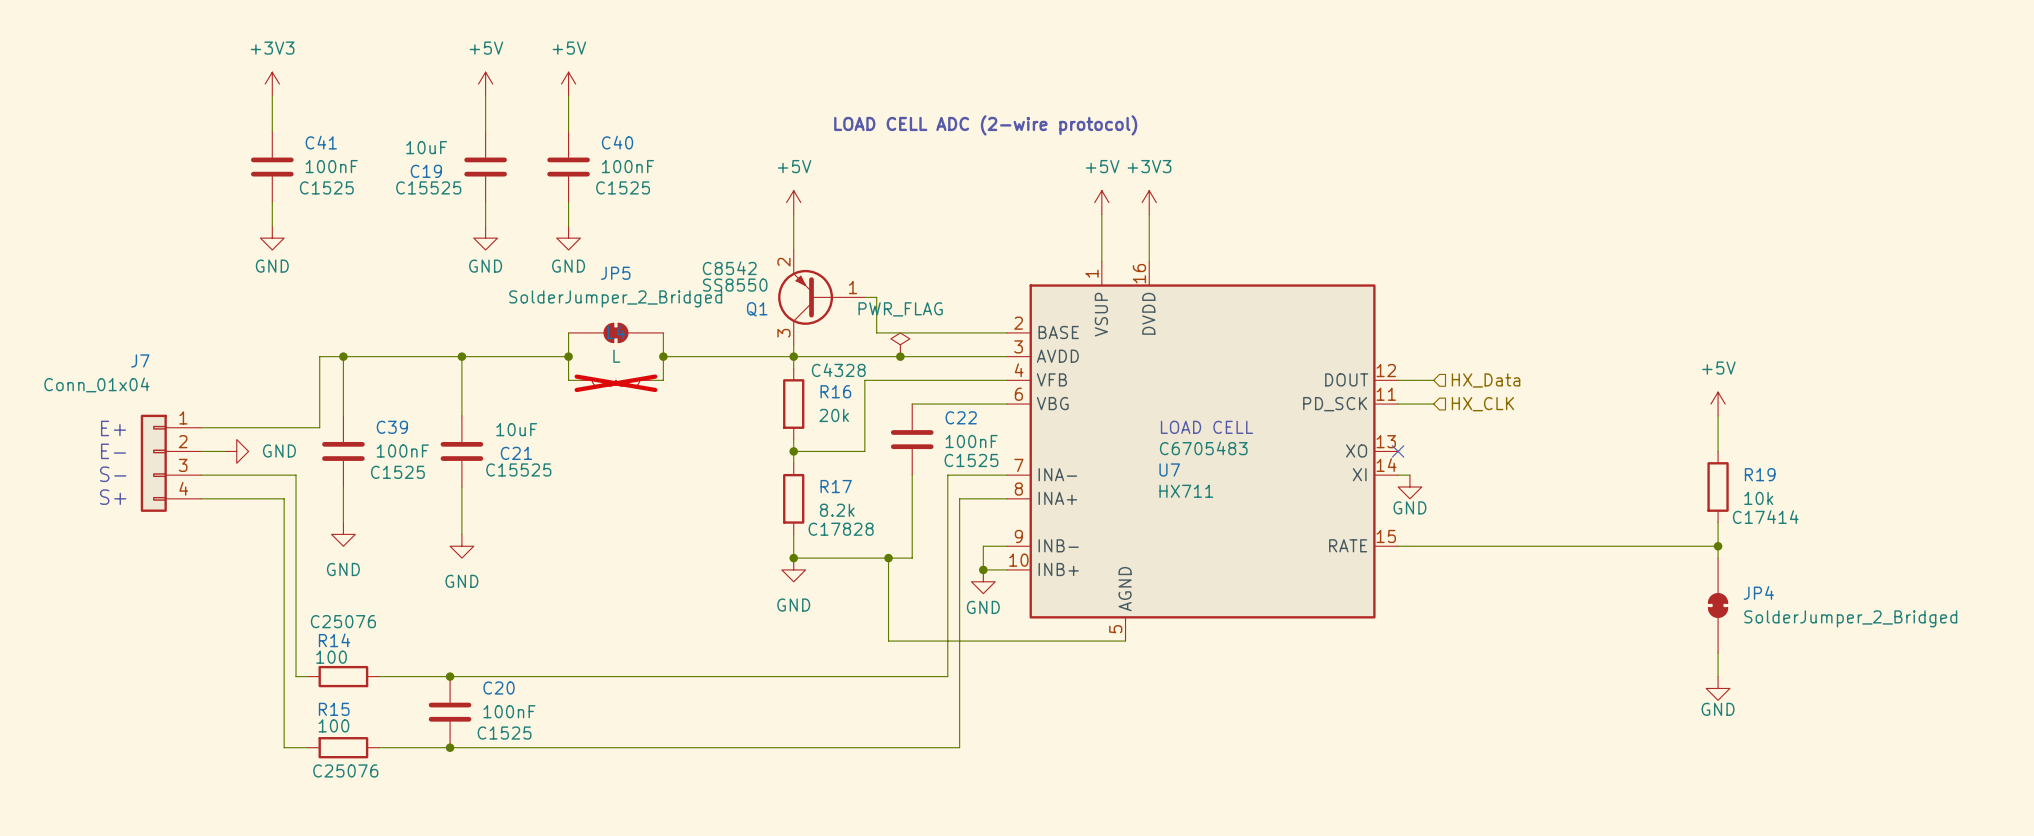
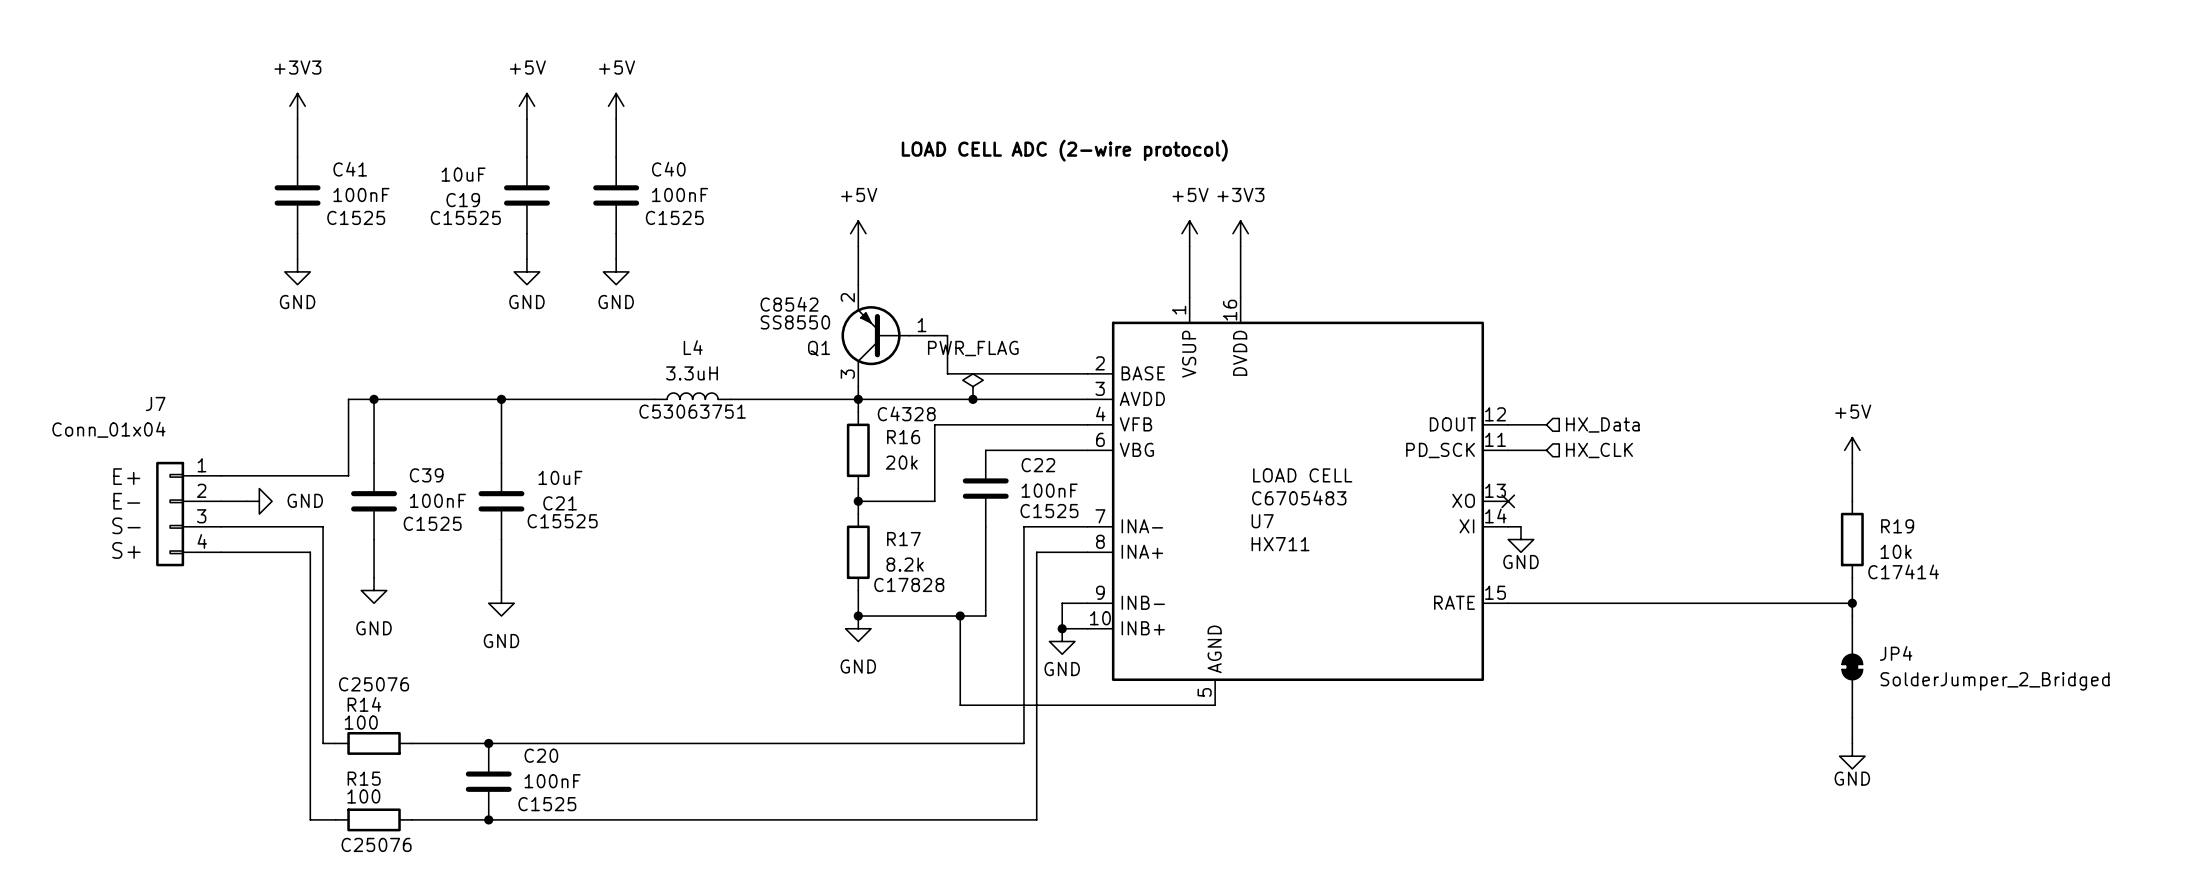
wire: (568, 332) (568, 380) (580, 380) -> none
JP5: SolderJumper_2_Bridged (615, 332) -> none
wire: (663, 332) (663, 380) (651, 380) -> none
wire: none -> (616, 399) (654, 399)
junction: (568, 356) -> none
L4 value: L (616, 356) -> 3.3uH (692, 373)
junction: (663, 356) -> none
L4 text: none -> C53063751 (692, 411)
L4 rotation: 0° (615, 383) -> 180° (692, 396)
L4 do-not-place cross: (615, 383) -> none

